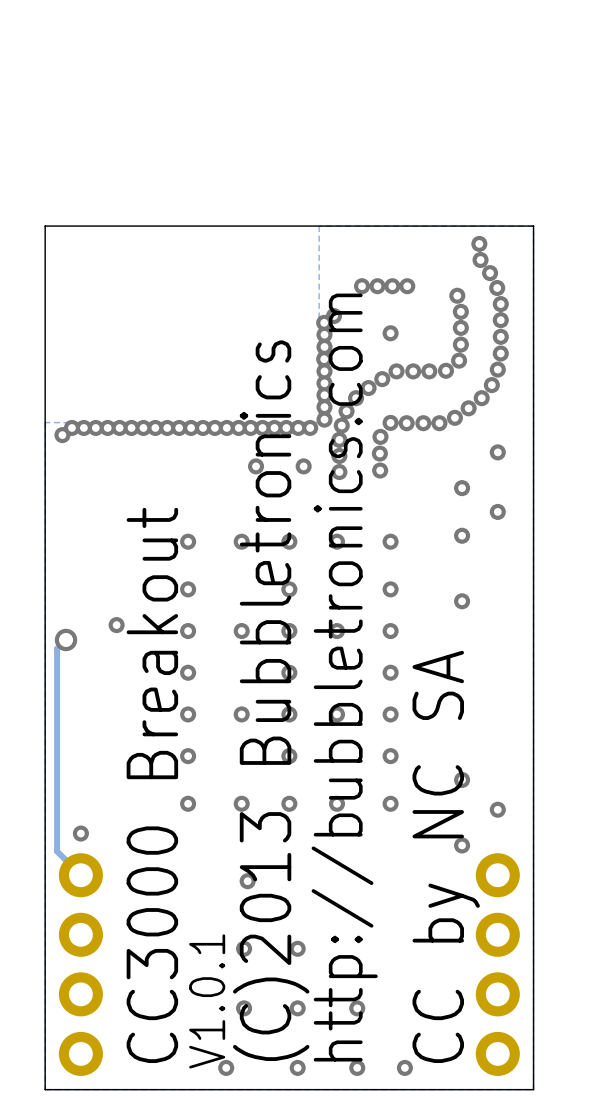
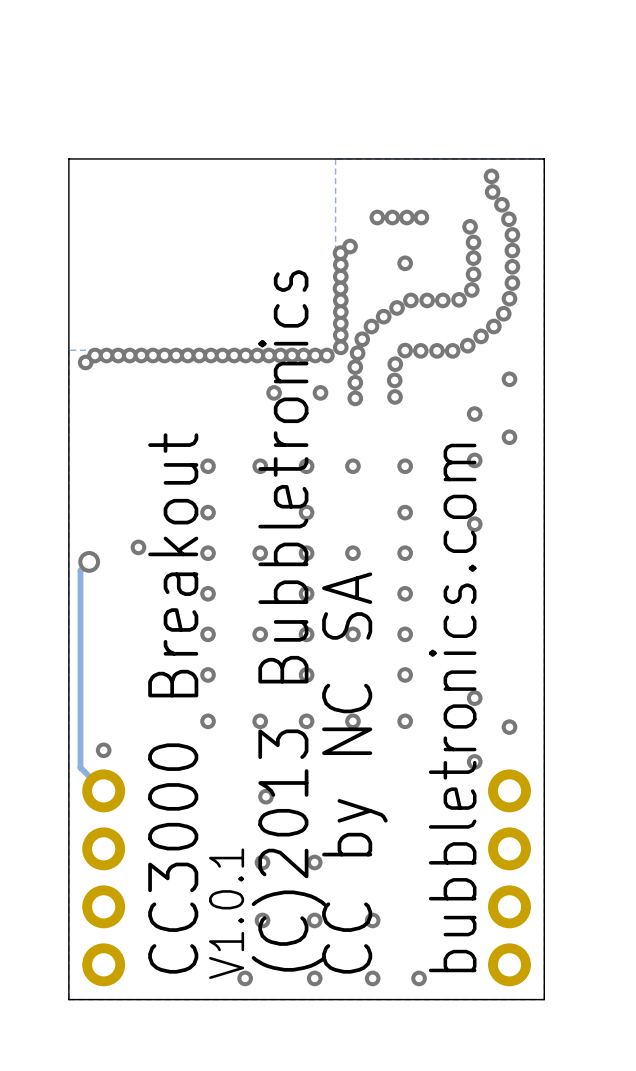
text: http://bubbletronics.com (344, 677) -> CC by NC SA (354, 773)
text: CC by NC SA (446, 856) -> bubbletronics.com (452, 707)

